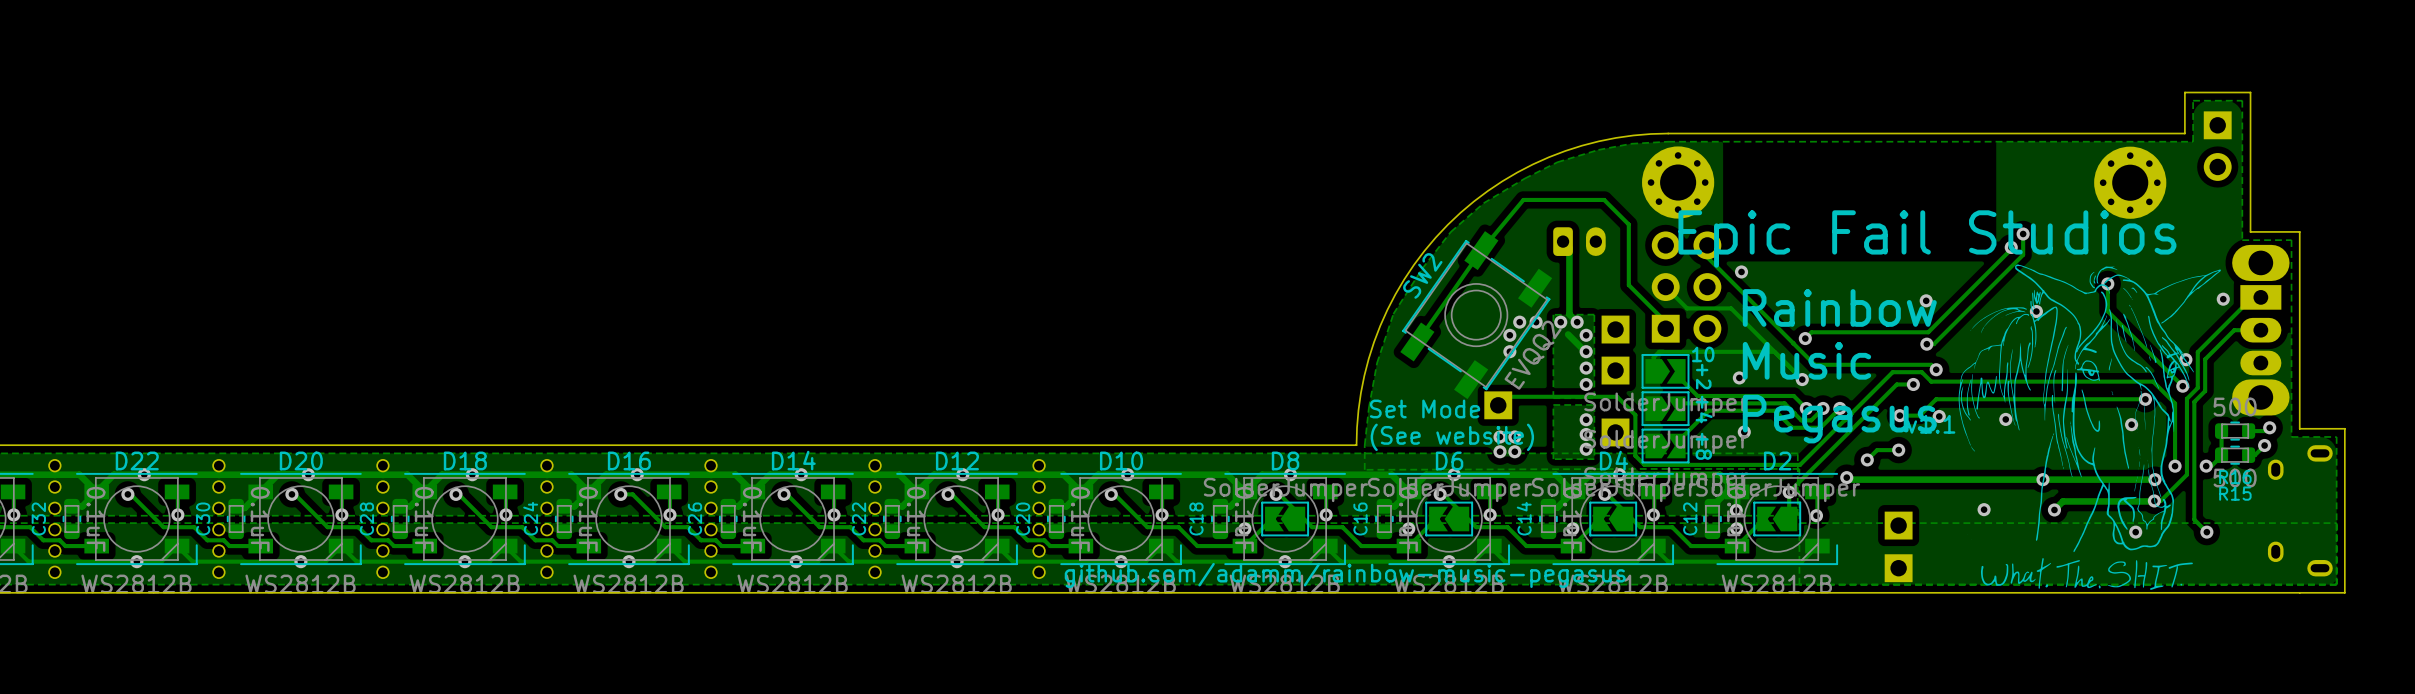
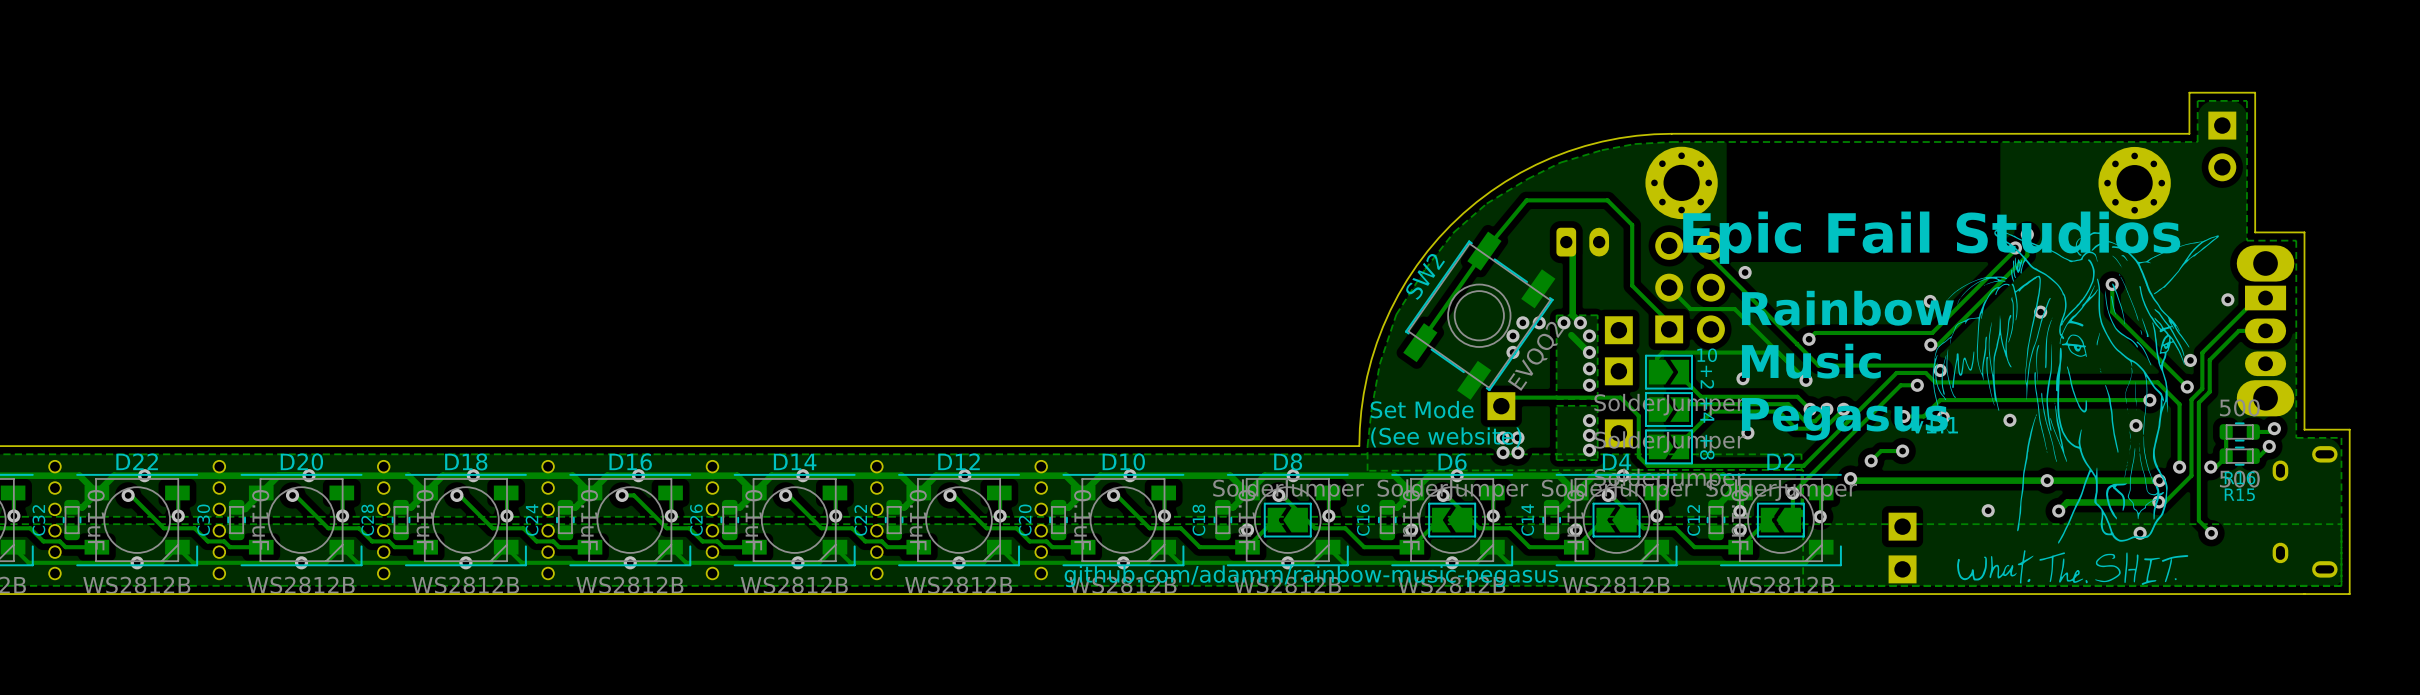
drawing: none -> [1932, 229, 2219, 585]
drawing: [1958, 264, 2221, 590] -> none

